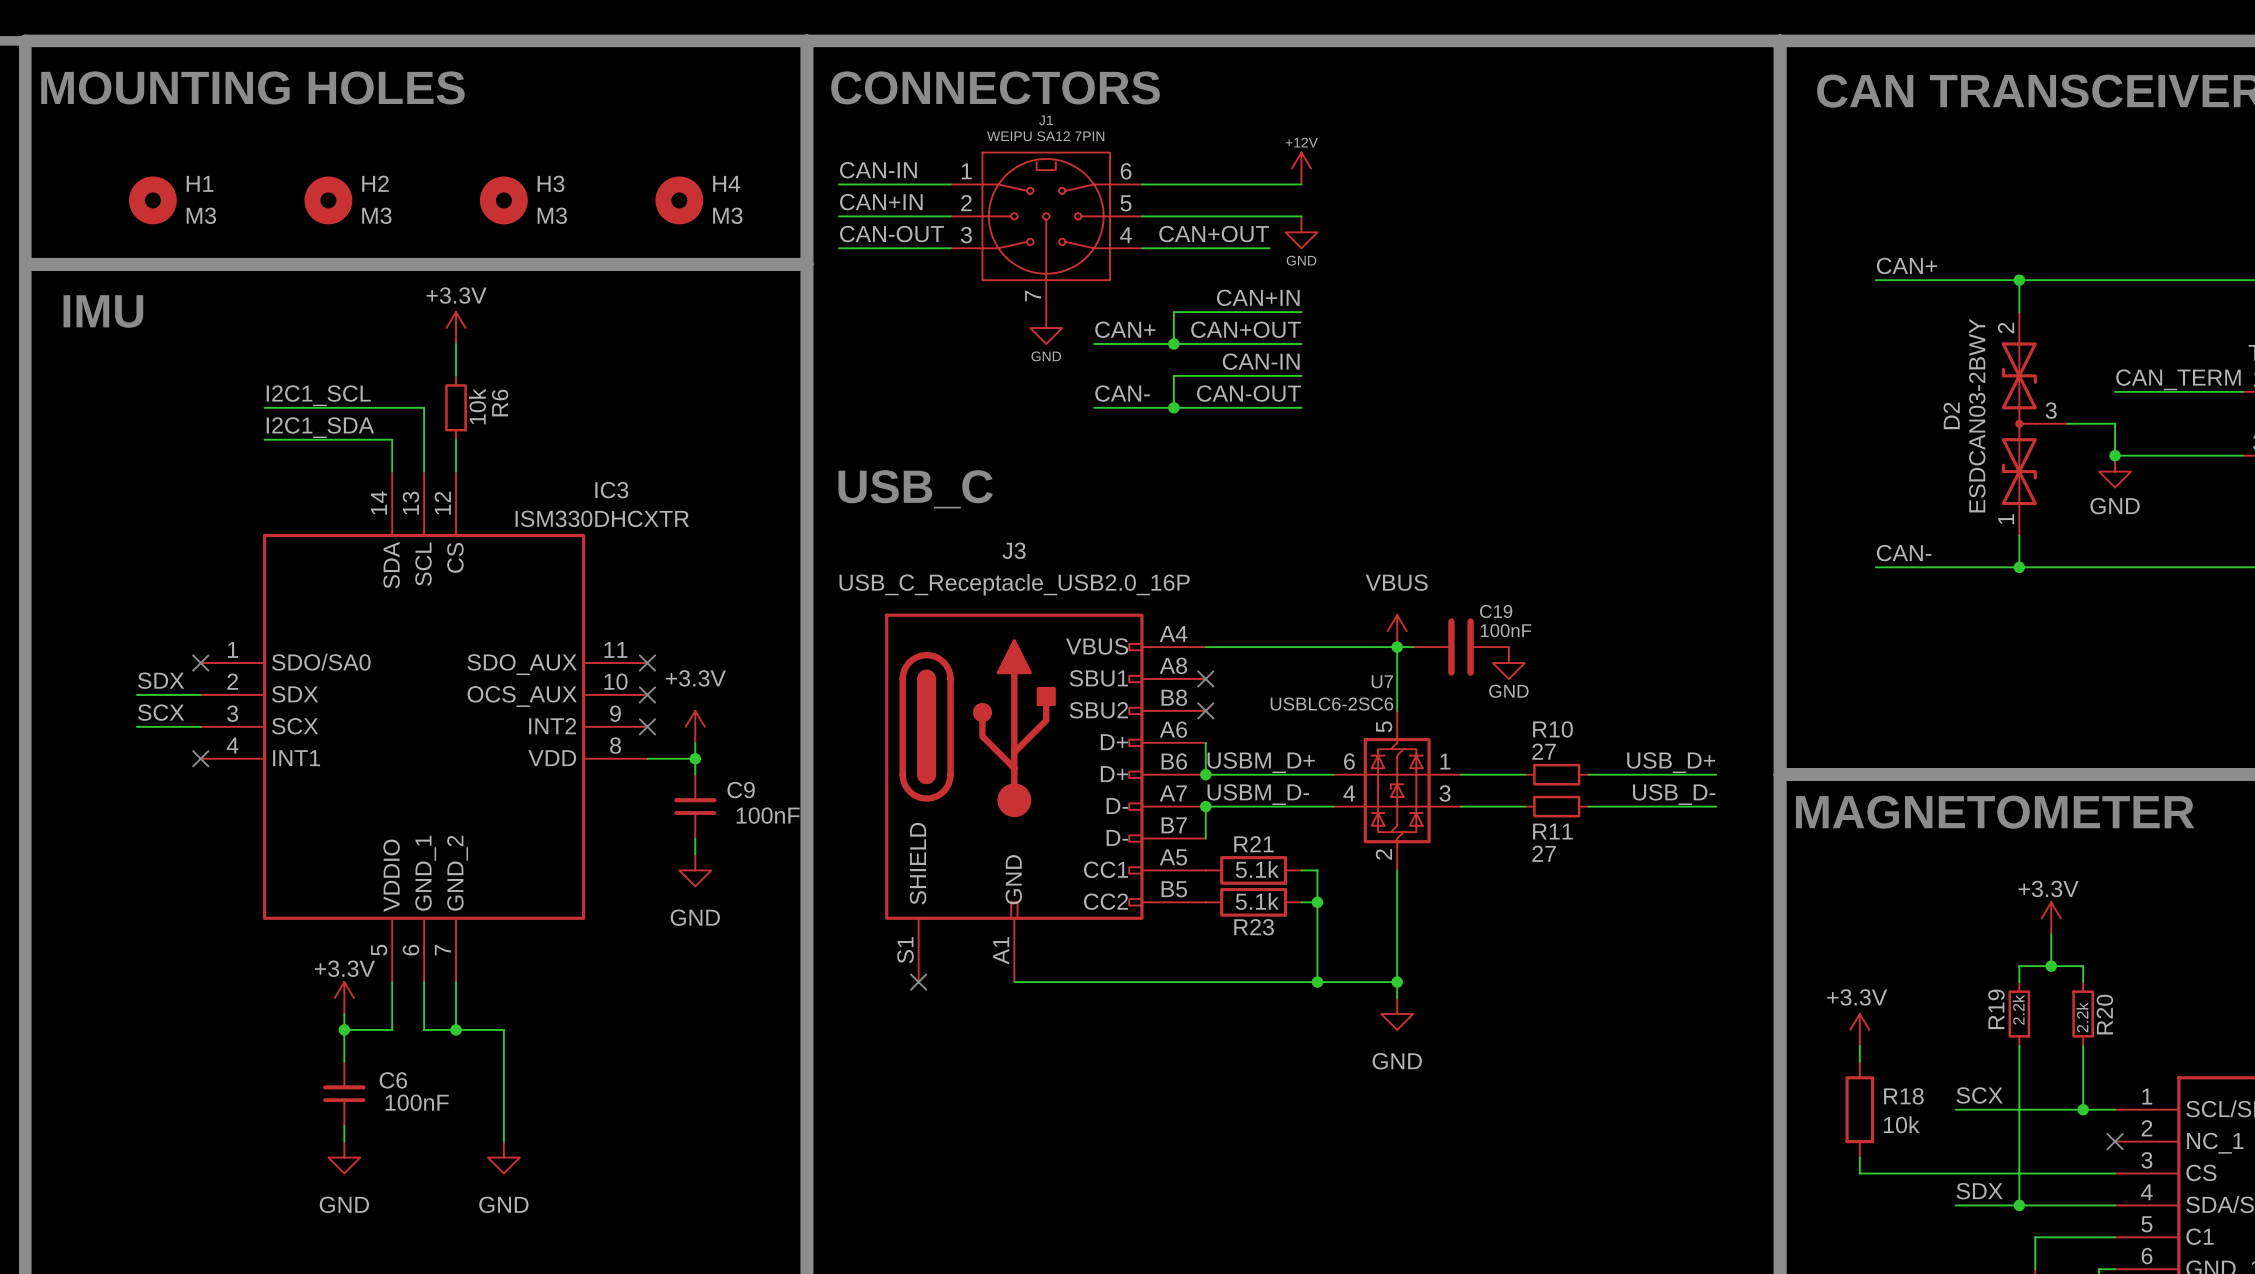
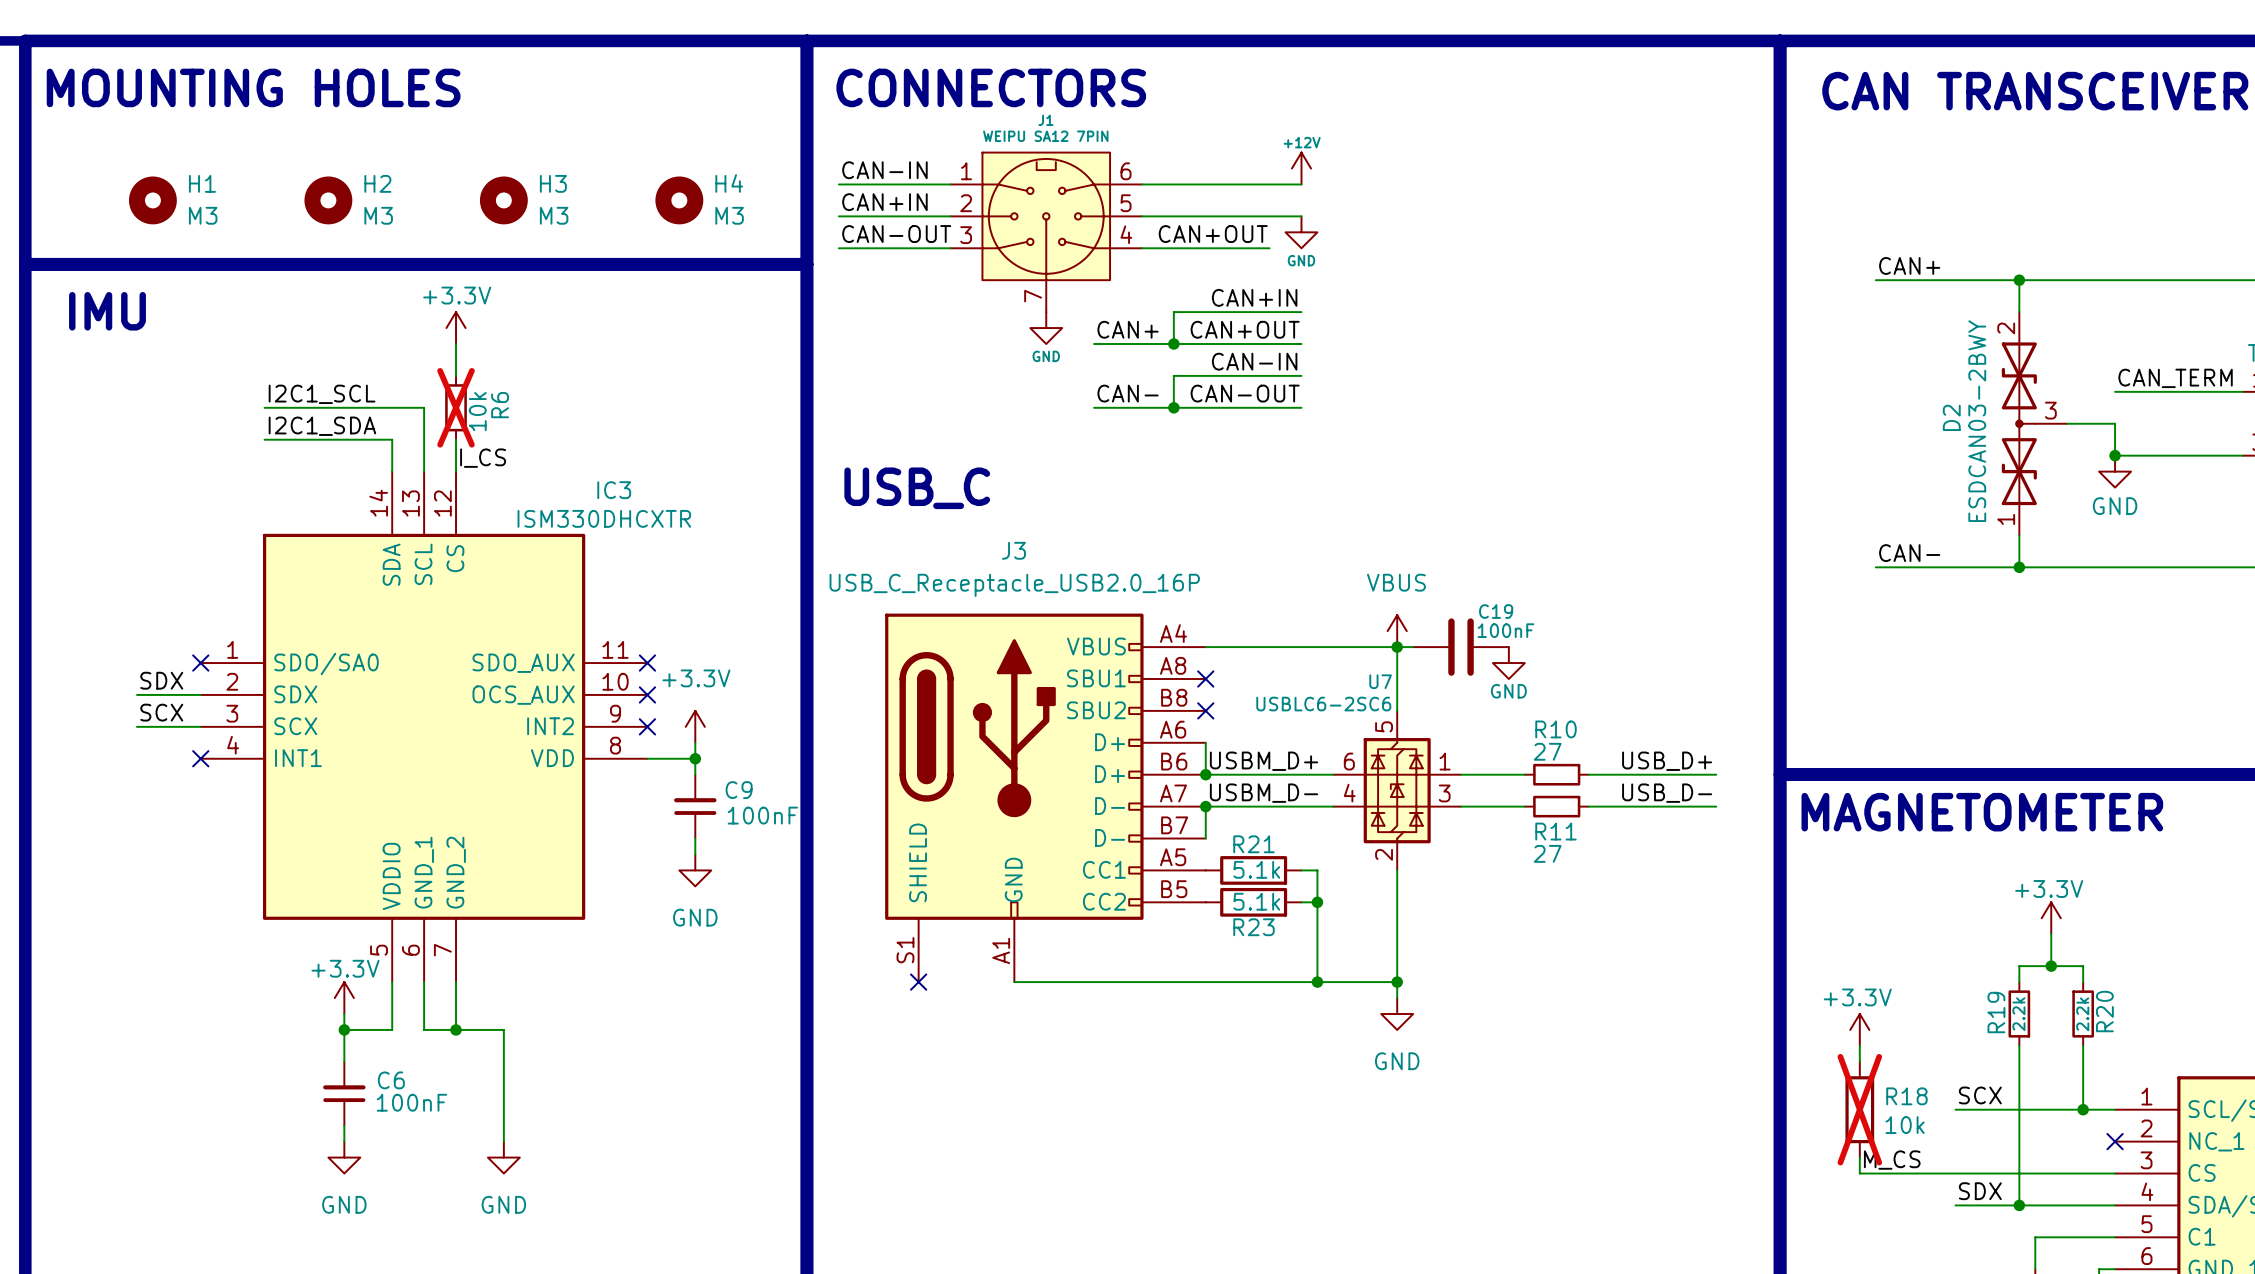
R6 do-not-place cross: none -> (456, 407)
label: none -> I_CS (483, 458)
R18 do-not-place cross: none -> (1859, 1109)
label: none -> M_CS (1892, 1160)

